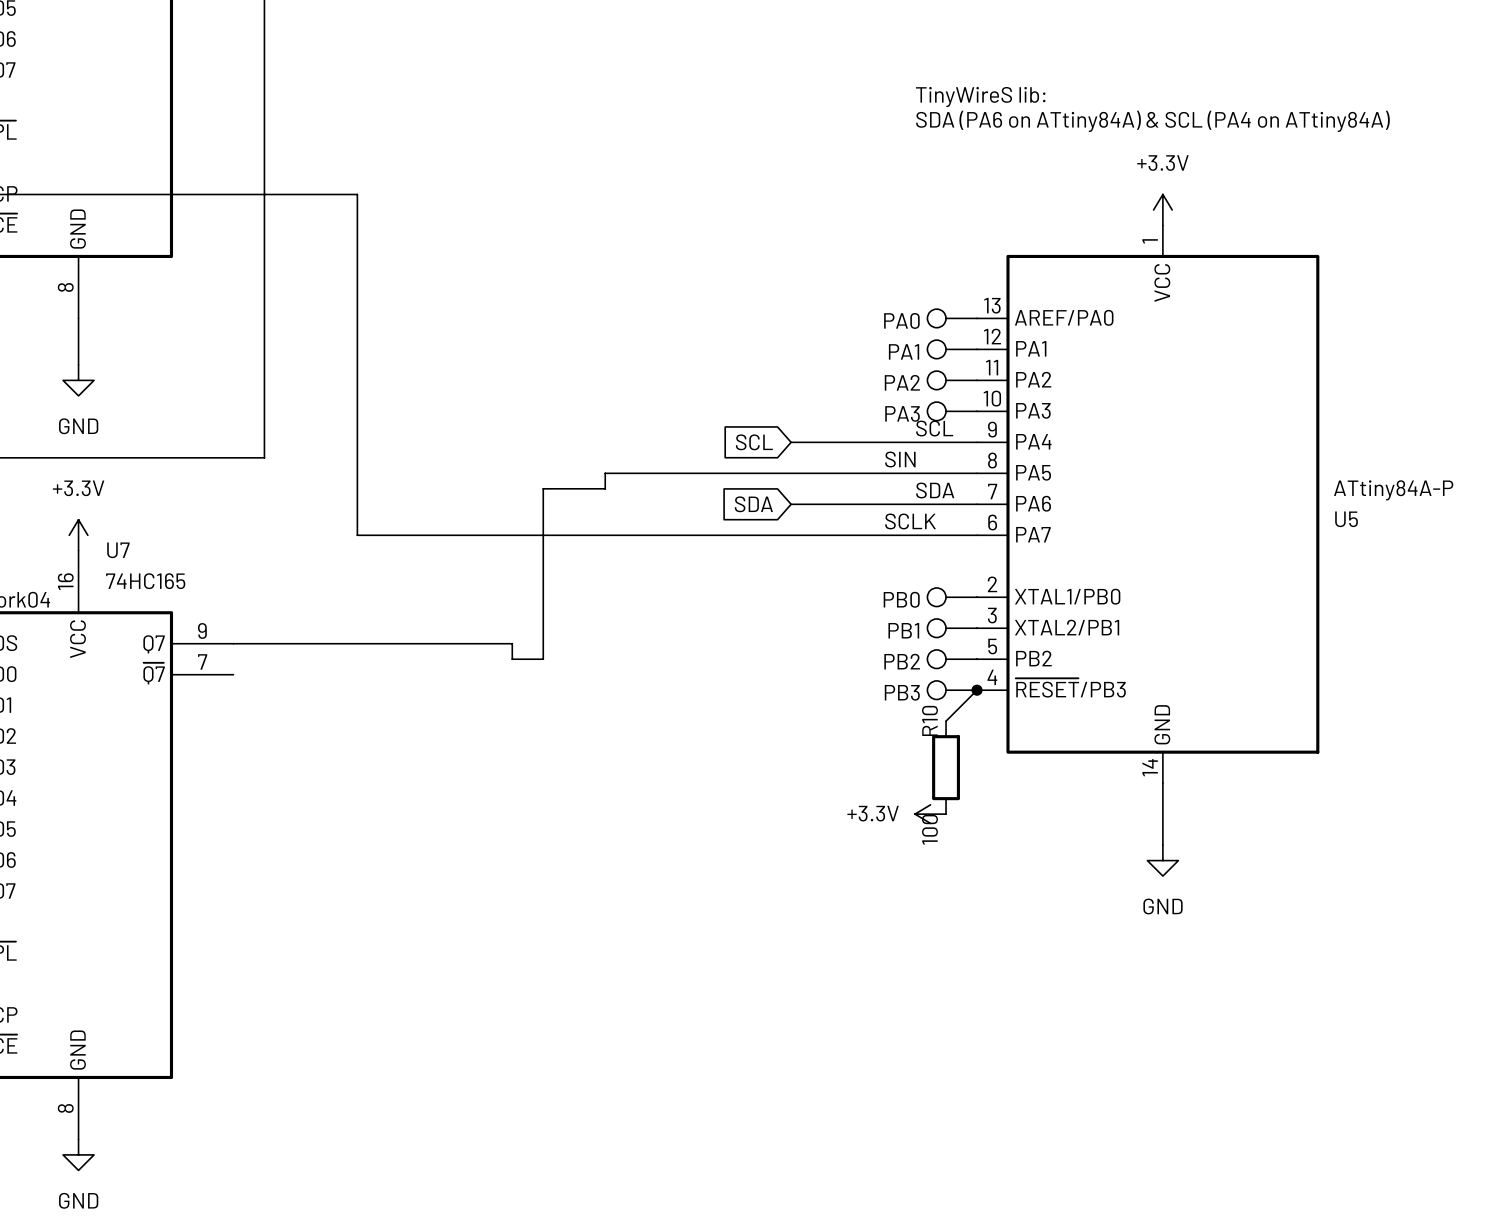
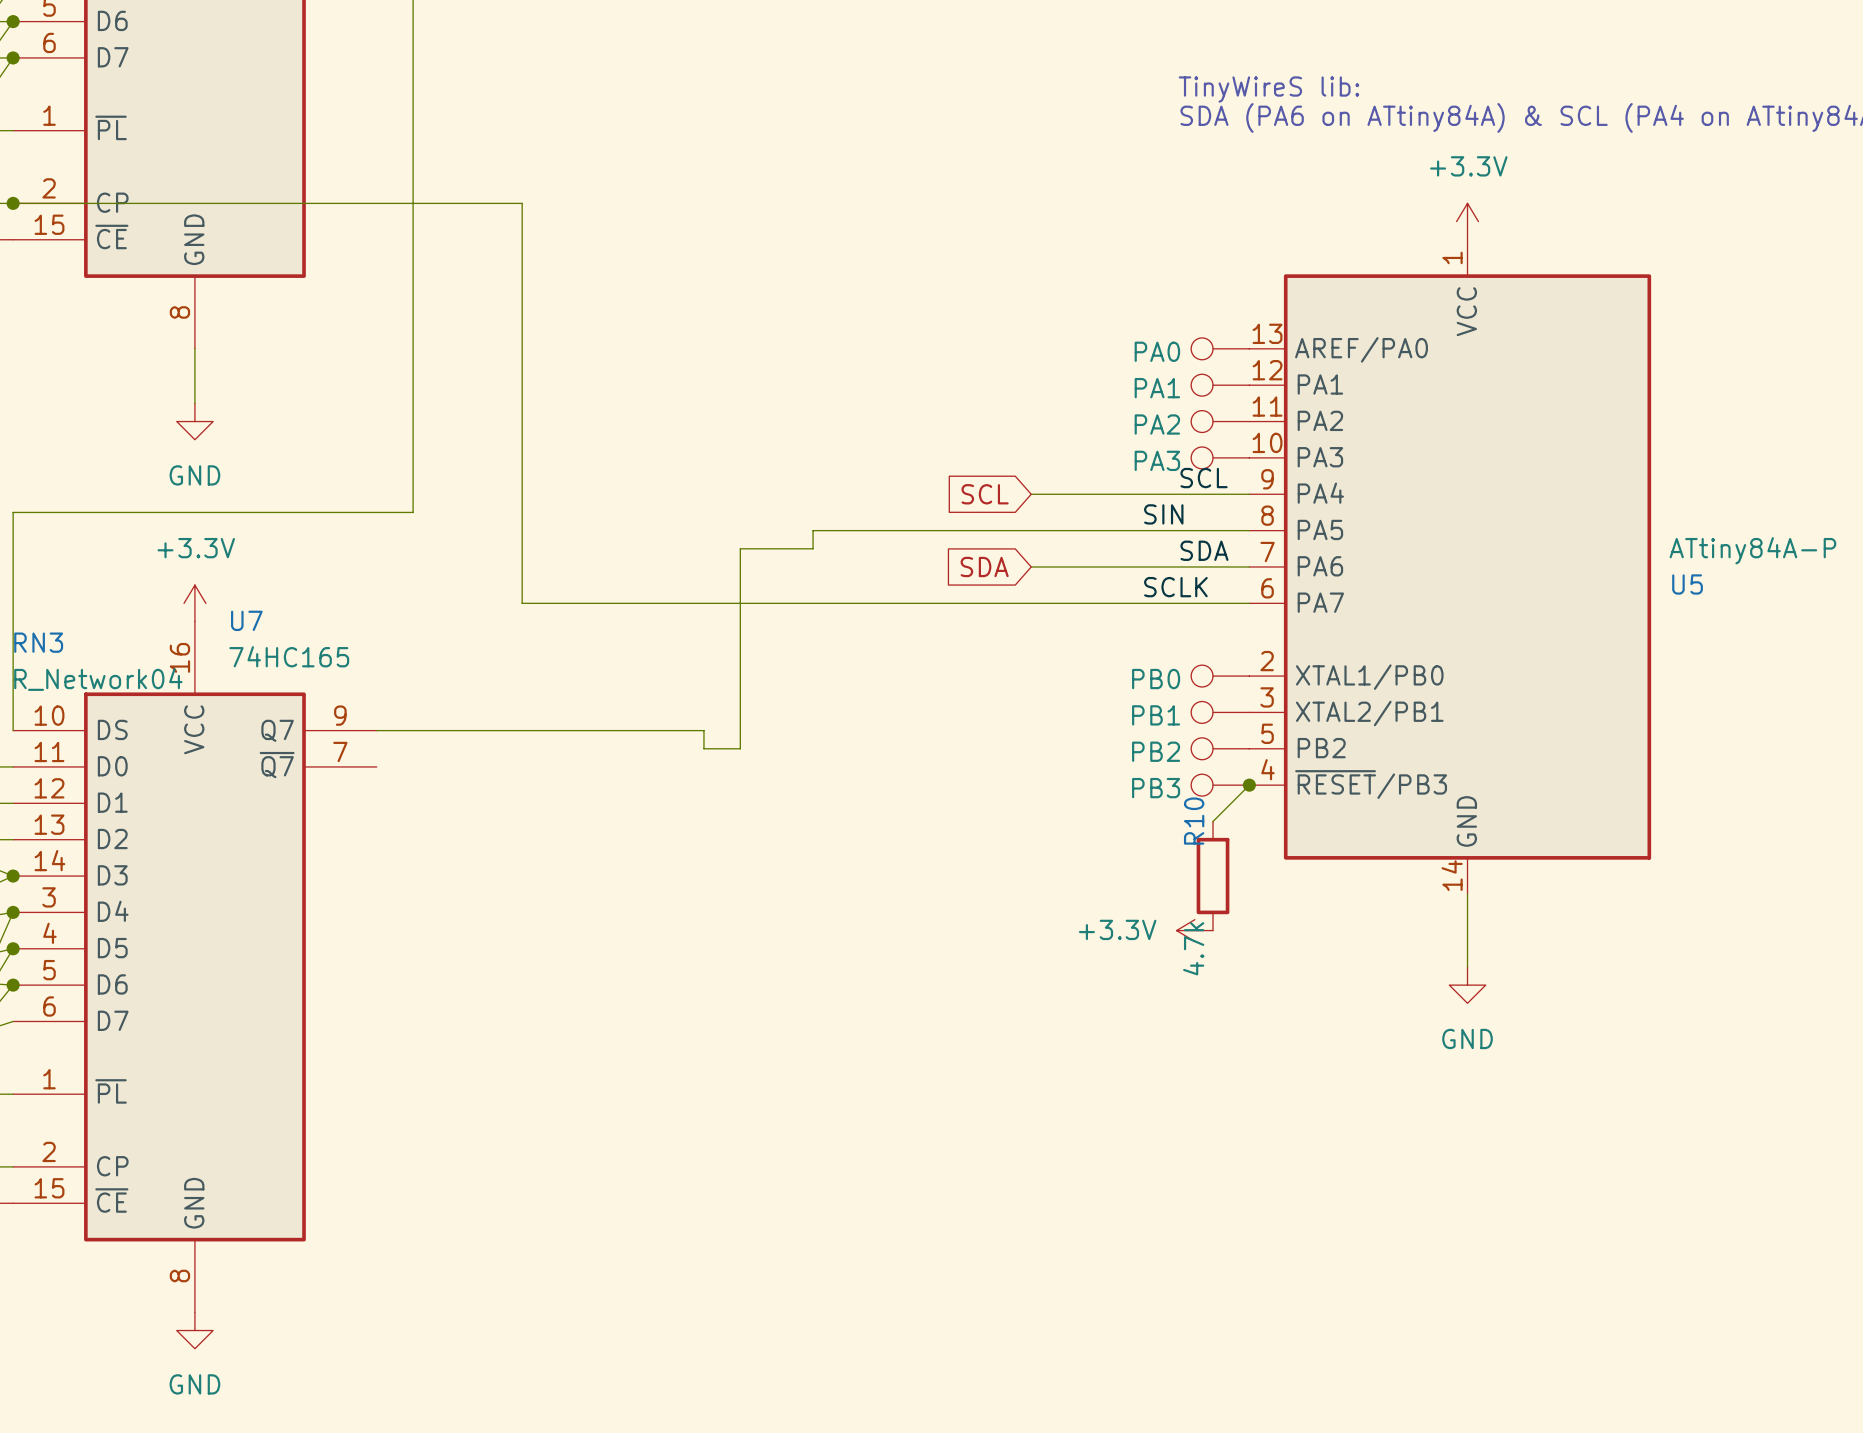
R10 value: 100 (929, 829) -> 4.7k (1193, 948)

